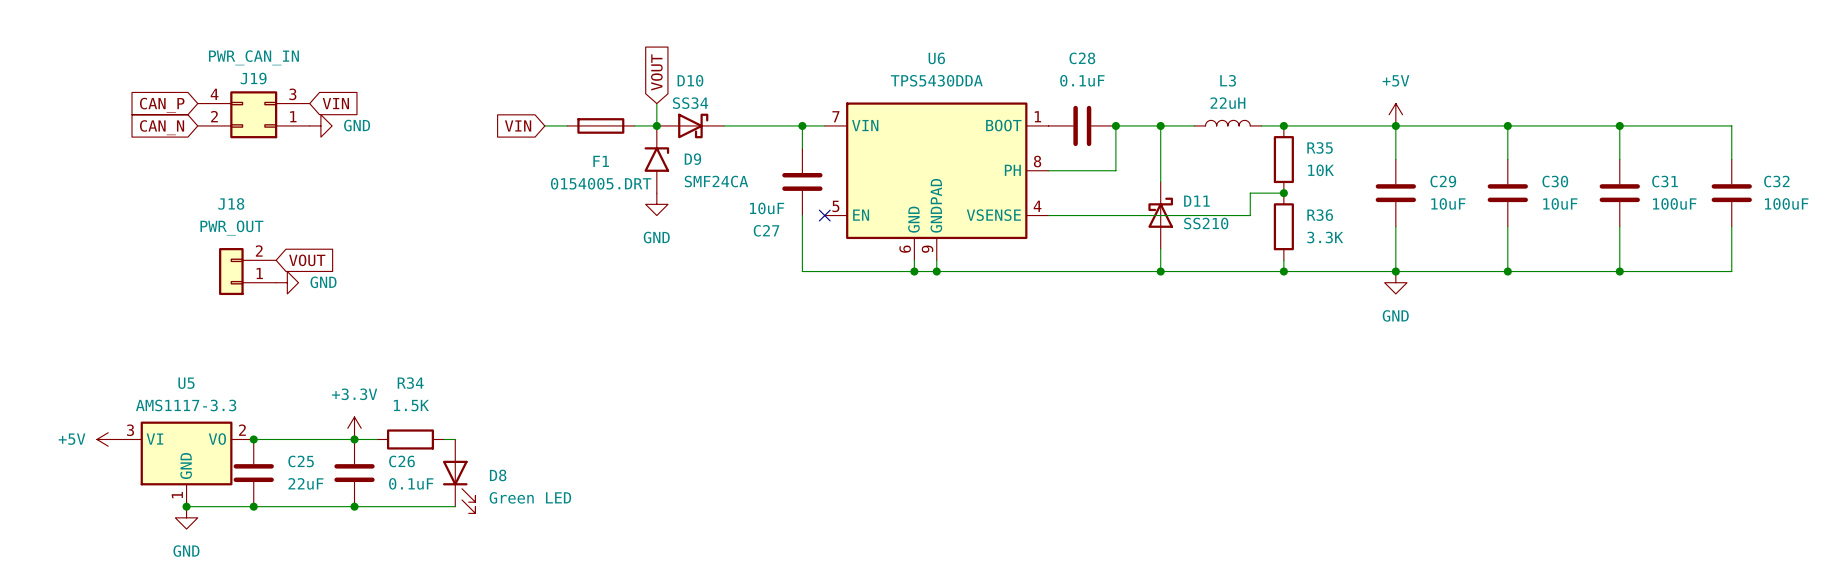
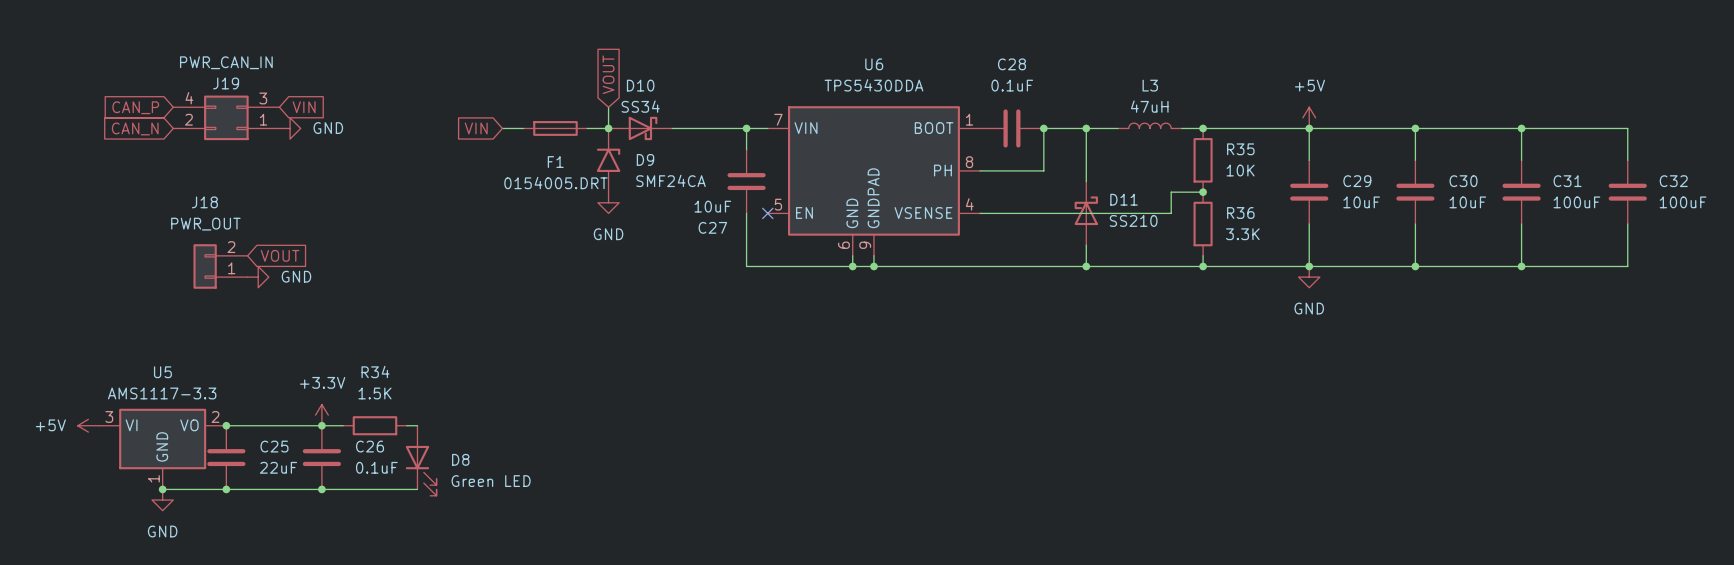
L3 value: 22uH (1227, 103) -> 47uH (1149, 106)

